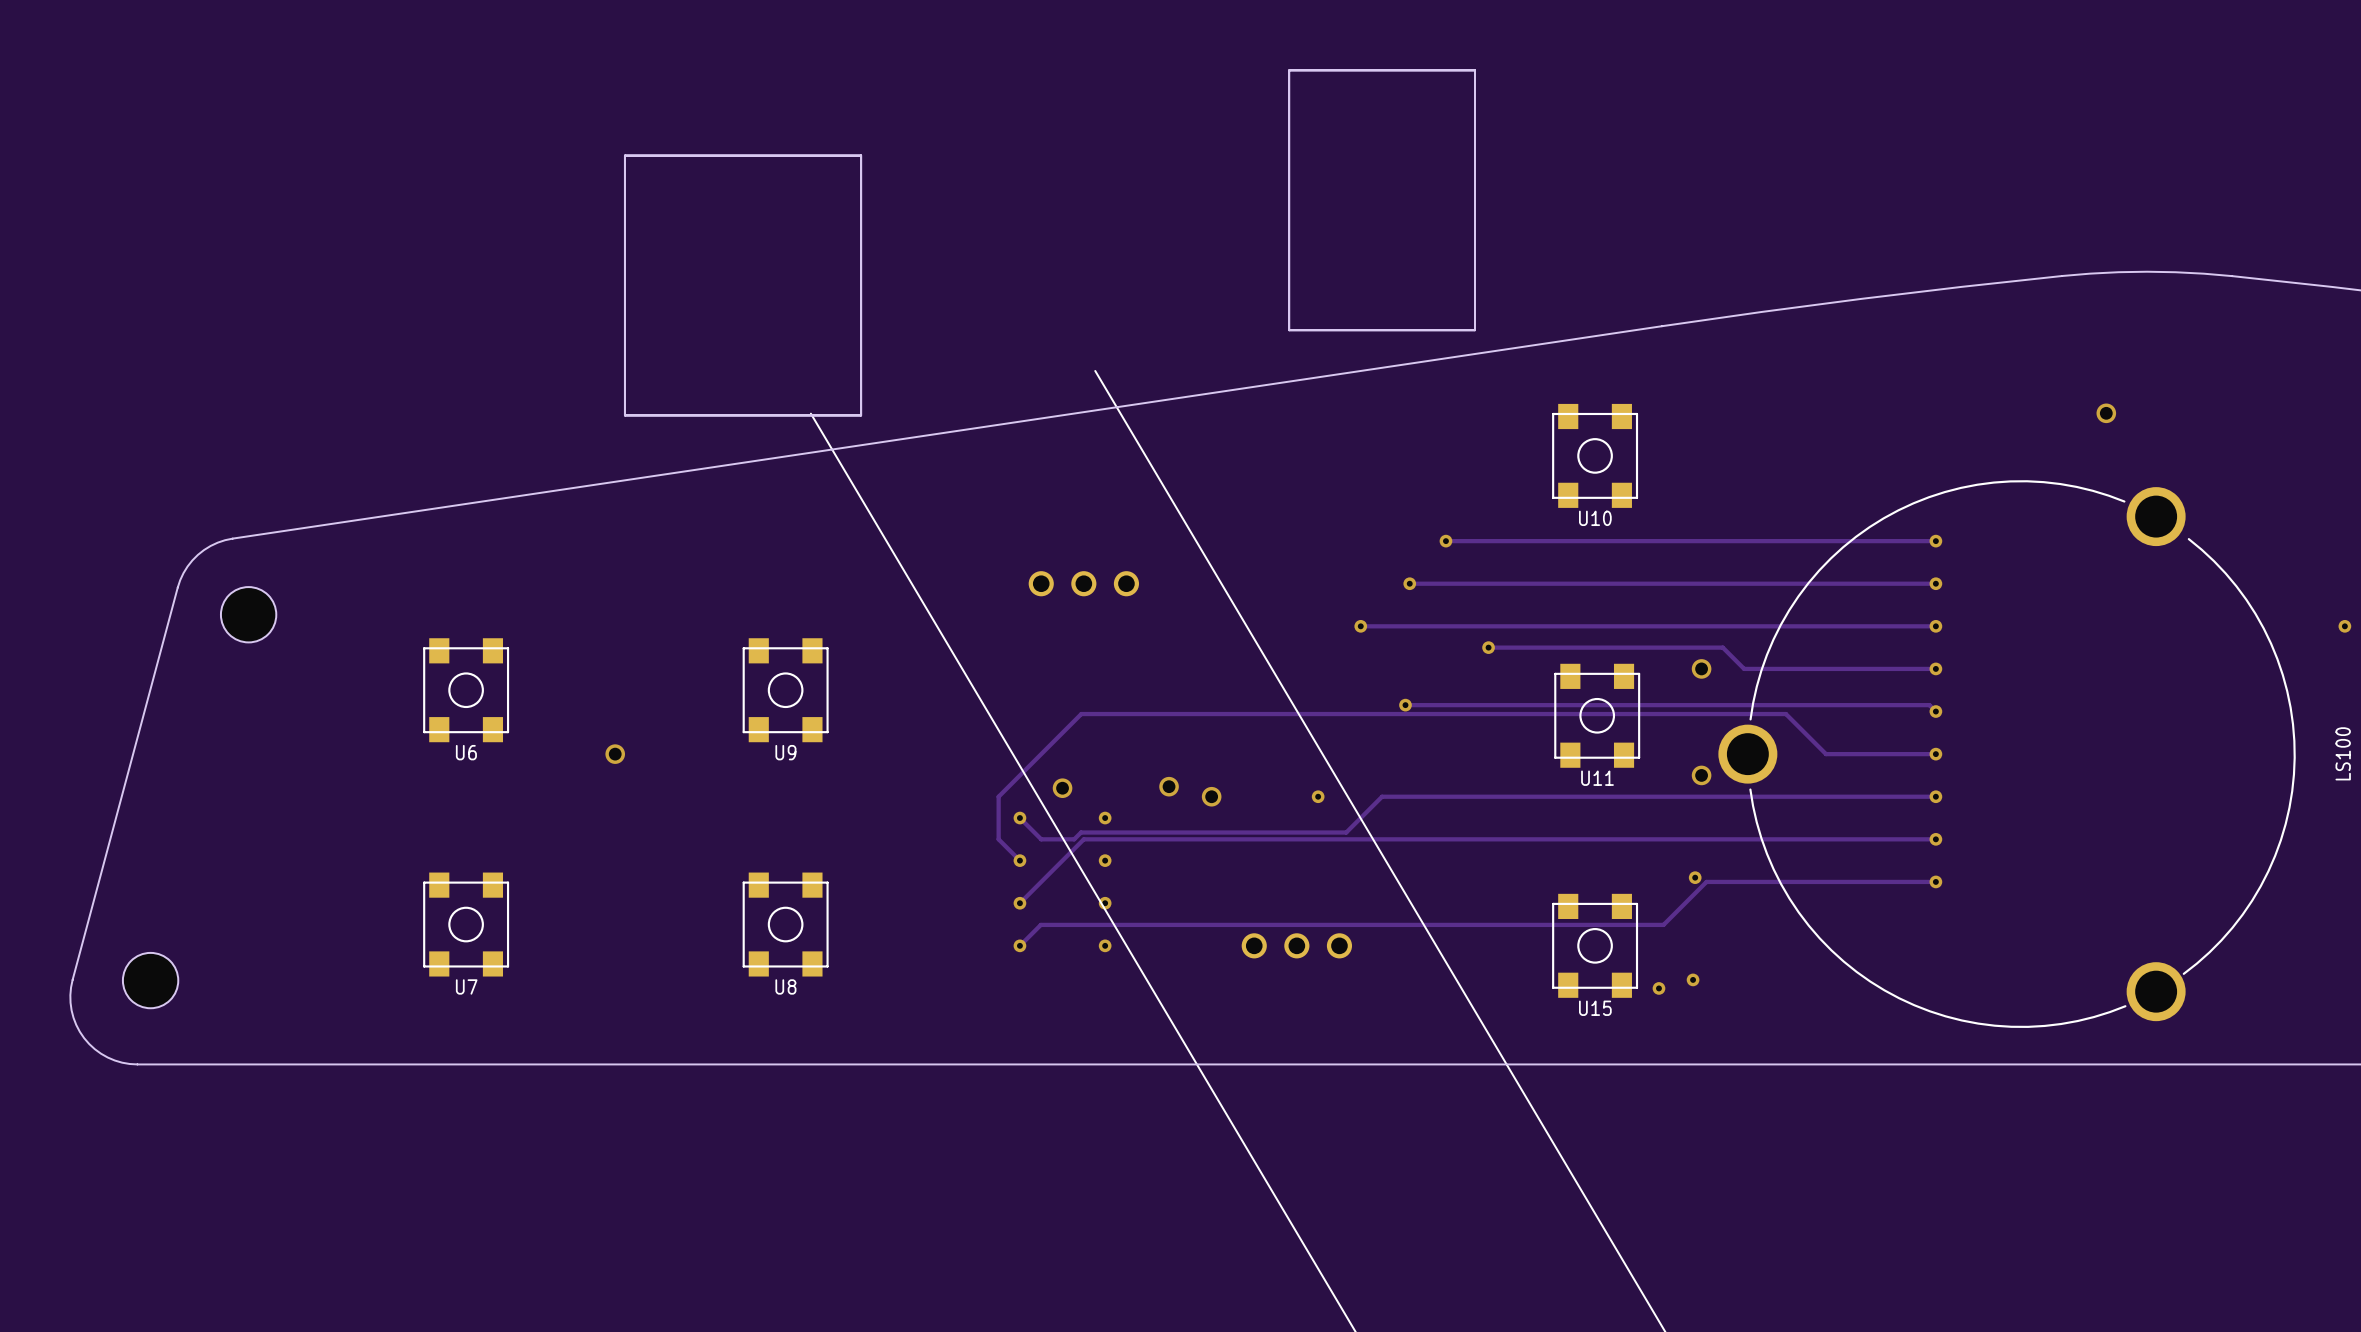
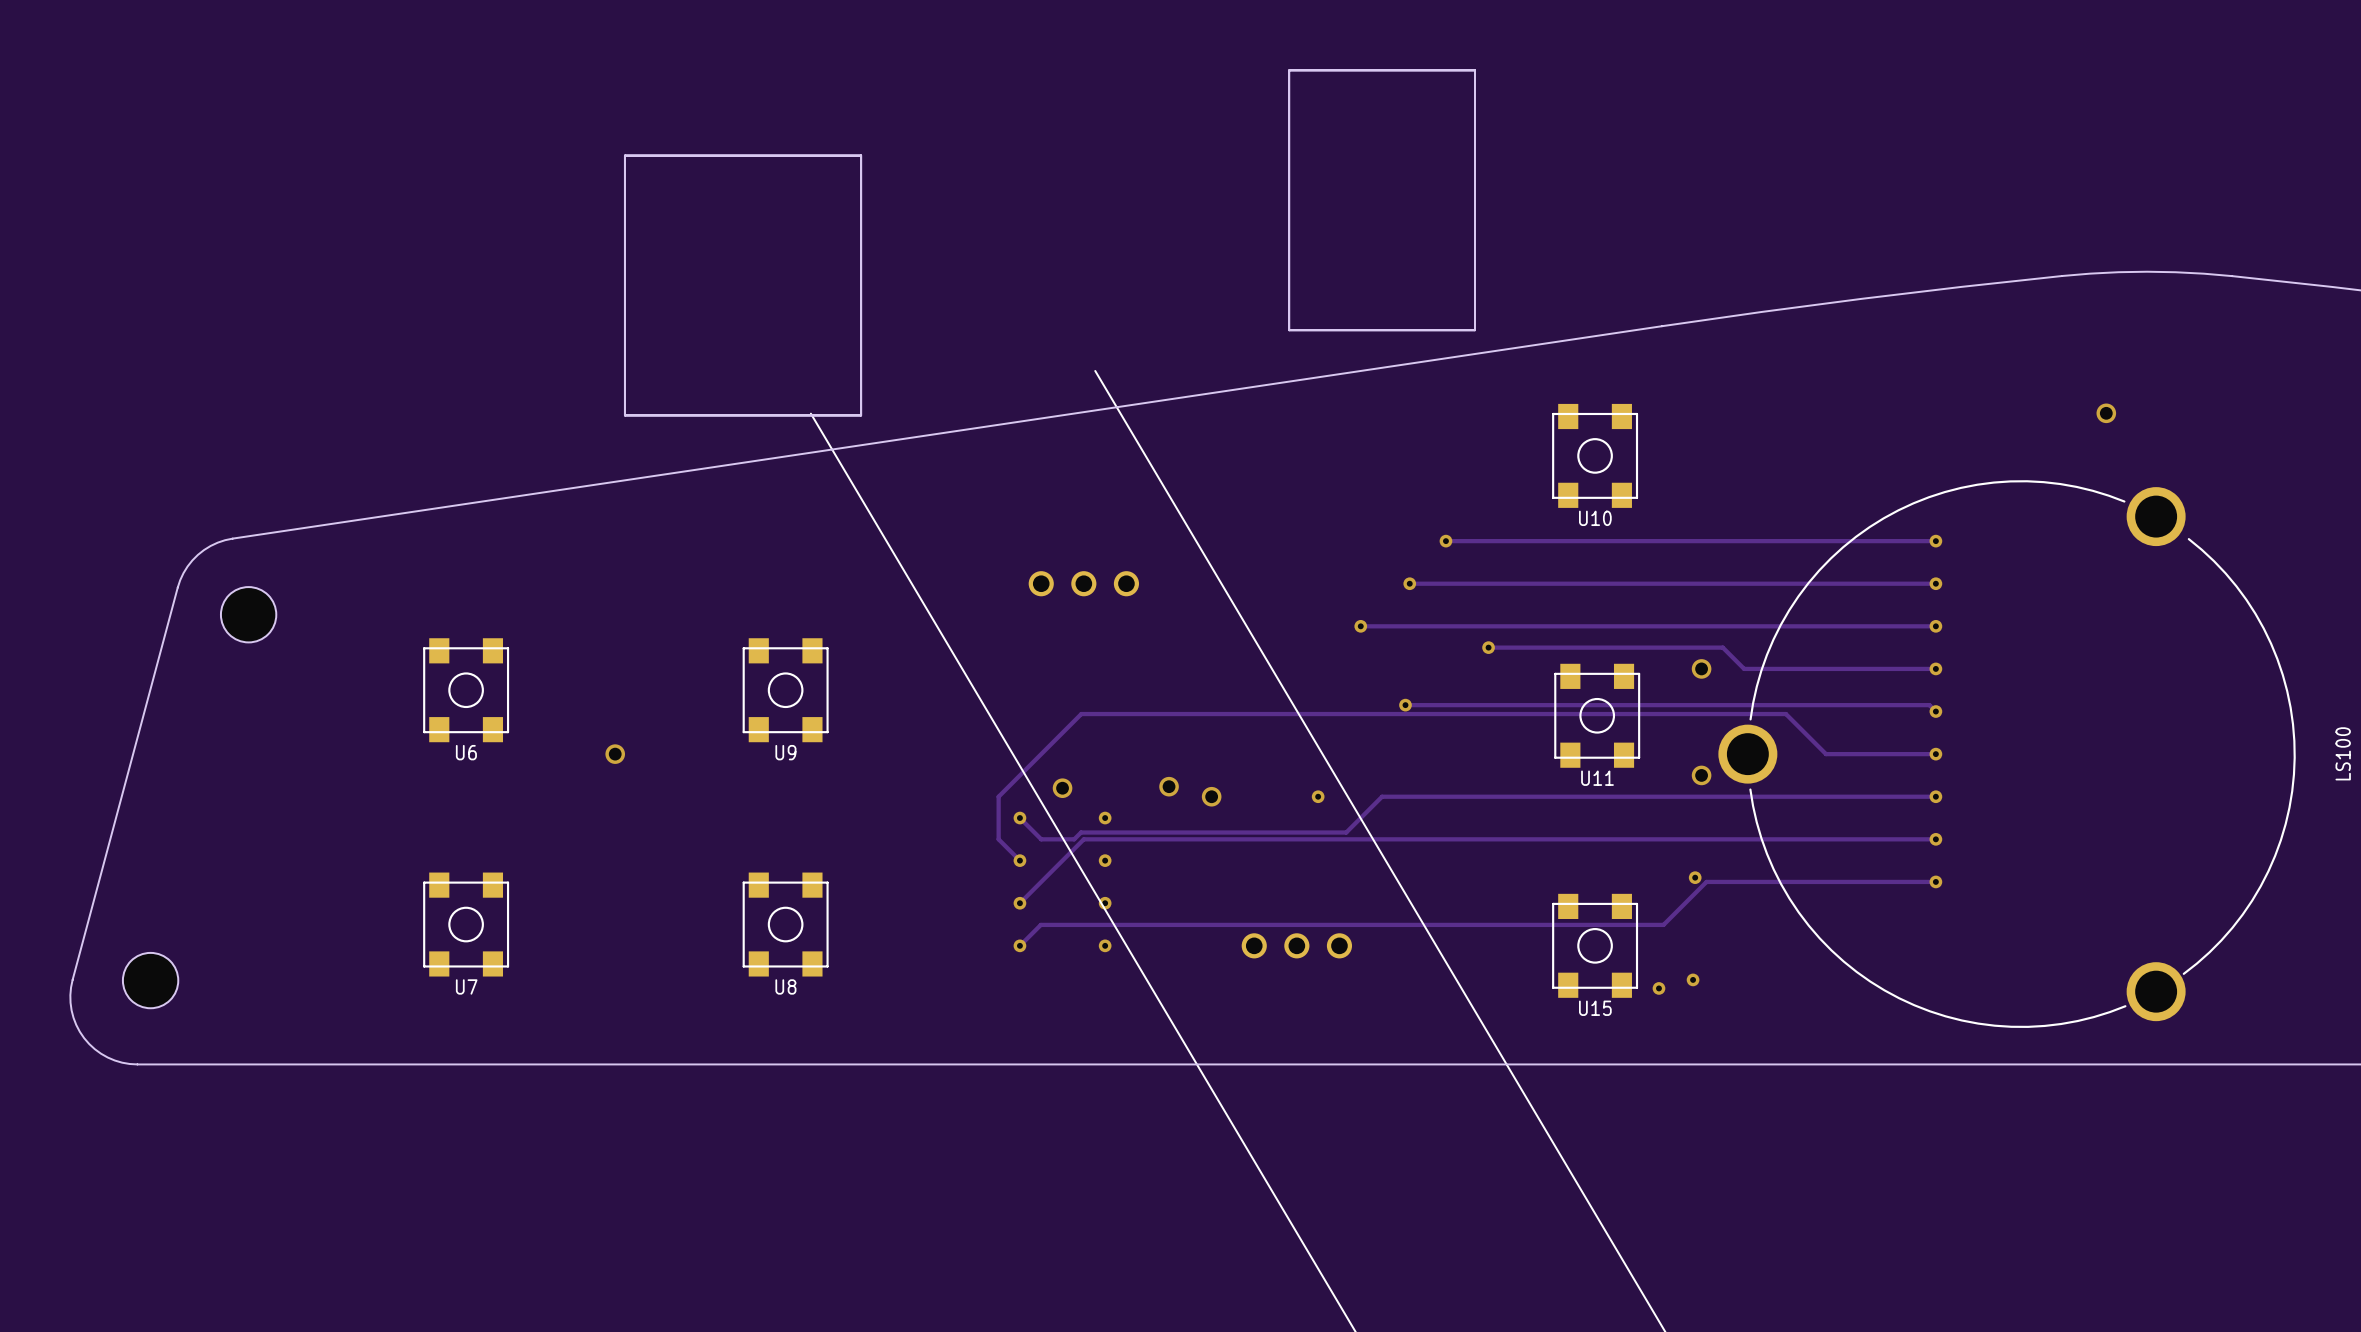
via: (2344, 626) -> none

